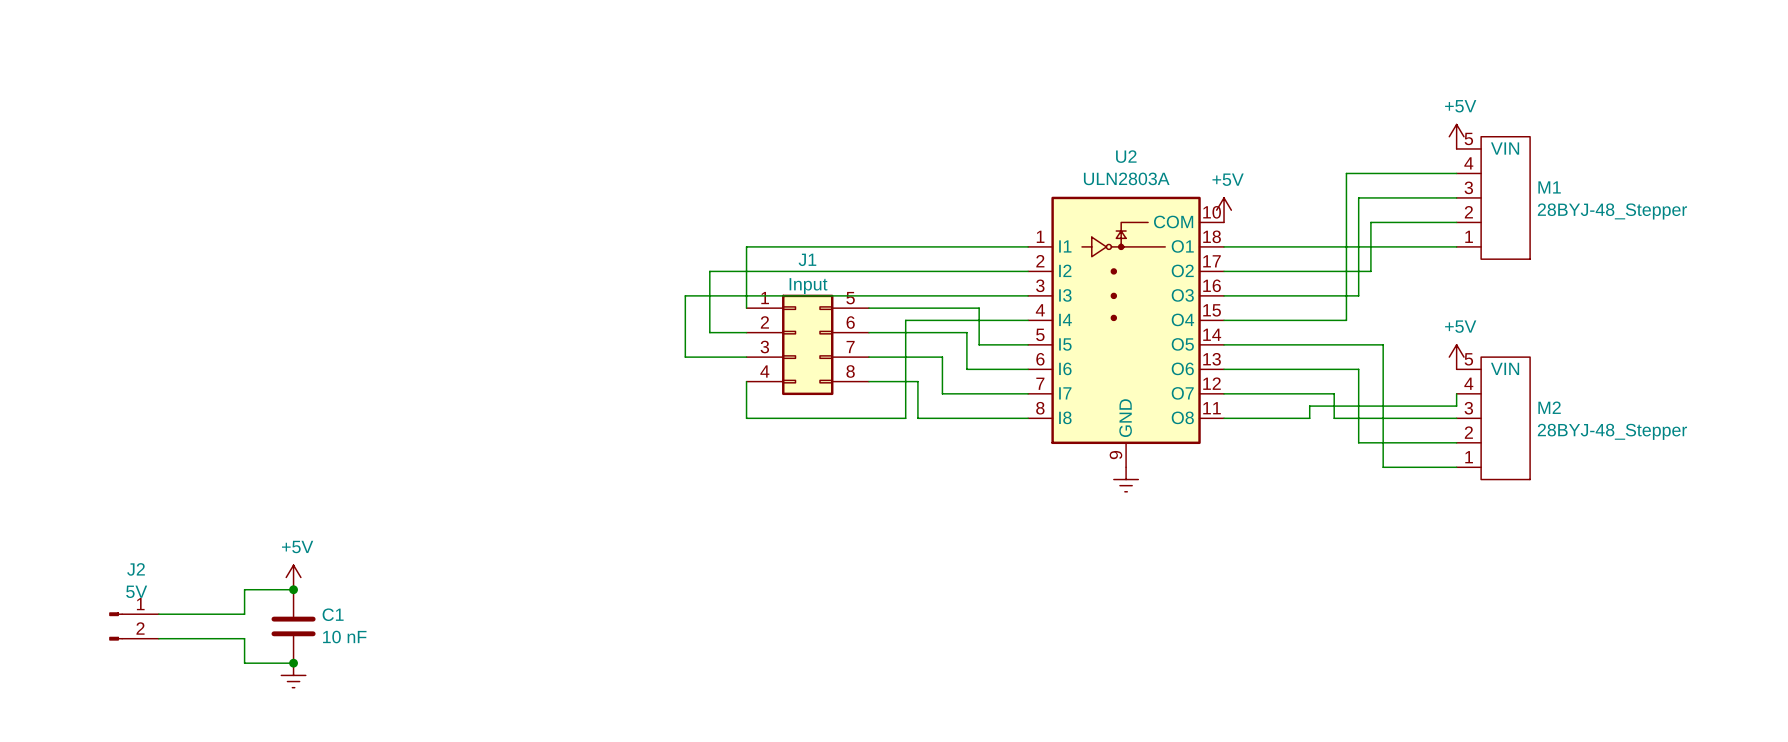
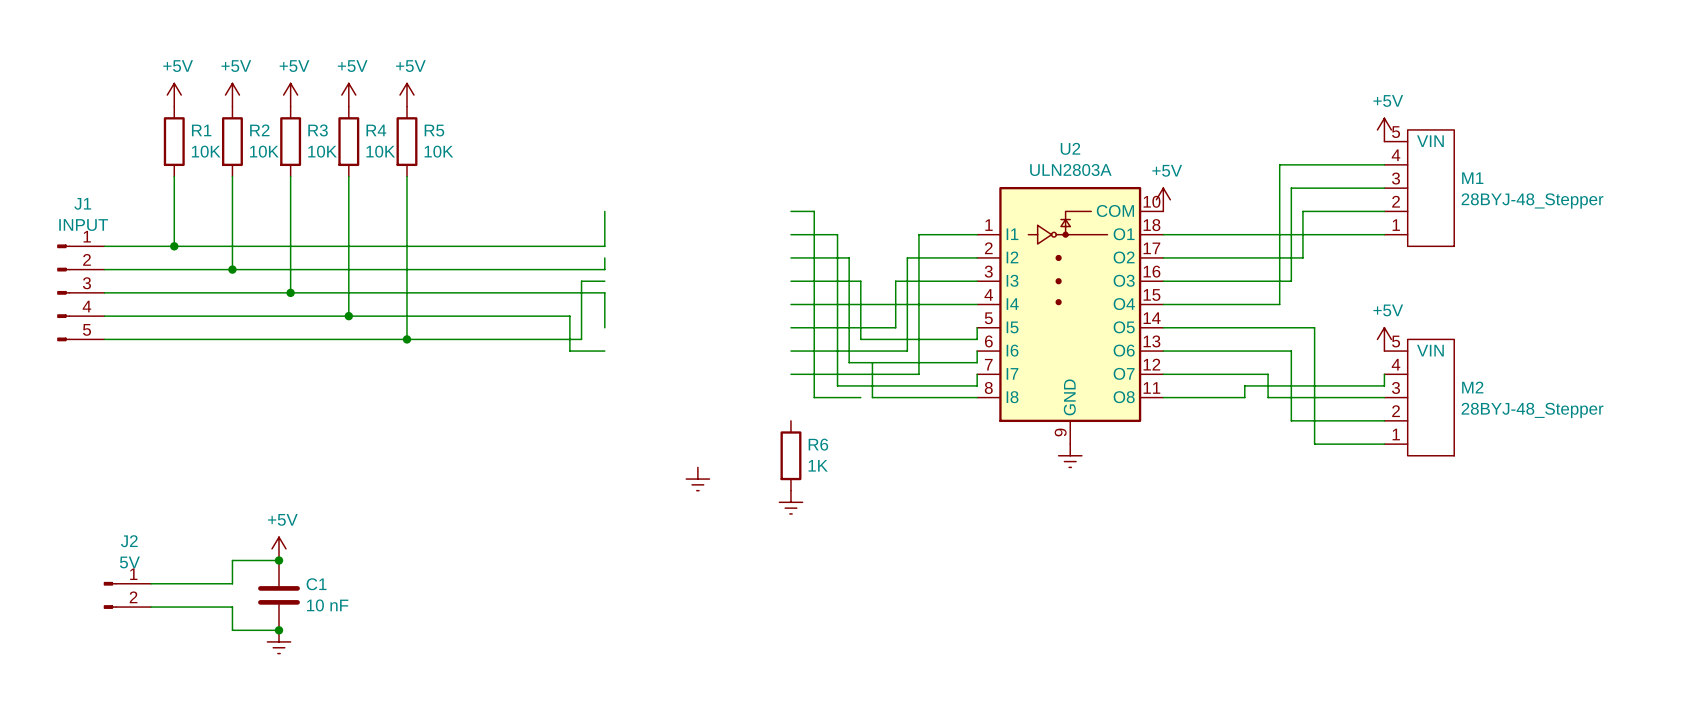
power symbol: none -> +5V (174, 95)
power symbol: none -> +5V (232, 95)
power symbol: none -> +5V (290, 95)
power symbol: none -> +5V (348, 95)
power symbol: none -> +5V (406, 95)
R1: none -> 10K (174, 141)
R2: none -> 10K (232, 141)
R3: none -> 10K (290, 141)
R4: none -> 10K (348, 141)
R5: none -> 10K (406, 141)
wire: none -> (174, 176) (174, 246)
wire: none -> (232, 176) (232, 269)
wire: none -> (290, 176) (290, 292)
wire: none -> (348, 176) (348, 316)
wire: none -> (406, 176) (406, 339)
wire: none -> (604, 211) (604, 246) (104, 246)
wire: (832, 246) (746, 246) (746, 308) -> none
wire: (881, 246) (966, 246) -> (918, 316) (918, 234)
wire: none -> (837, 234) (837, 385) (977, 385) (977, 374)
junction: none -> (174, 246)
wire: none -> (604, 257) (604, 269) (104, 269)
wire: (832, 271) (709, 271) (709, 332) (746, 332) -> none
wire: (893, 271) (954, 271) -> (790, 351) (907, 351) (907, 257)
junction: none -> (232, 269)
J1 value: Input (808, 286) -> INPUT (83, 225)
J1 symbol: [746, 294, 869, 396] -> [57, 244, 105, 342]
wire: none -> (604, 281) (581, 281) (581, 339) (104, 339)
wire: (832, 295) (685, 295) (685, 357) (746, 357) -> none
wire: (905, 295) (942, 295) -> (790, 327) (895, 327) (895, 281)
wire: none -> (860, 281) (860, 304) (790, 304)
wire: none -> (104, 292) (604, 292) (604, 327)
junction: none -> (290, 292)
wire: (868, 308) (979, 308) (979, 344) (1028, 344) -> (895, 339) (977, 339) (977, 327)
wire: none -> (104, 316) (569, 316) (569, 351) (604, 351)
junction: none -> (348, 316)
wire: (868, 332) (966, 332) -> none
junction: none -> (406, 339)
wire: (868, 357) (905, 357) (905, 418) -> none
wire: (942, 357) (942, 393) -> (790, 374) (895, 374)
wire: (966, 369) (1028, 369) -> (872, 362) (977, 362) (977, 351)
wire: (746, 381) (746, 418) (856, 418) -> (790, 211) (814, 211) (814, 397)
wire: (868, 381) (893, 381) -> (849, 257) (849, 362)
wire: (966, 393) (1028, 393) -> (918, 374) (918, 351)
R6: none -> 1K (790, 455)
power symbol: none -> (697, 479)
power symbol: none -> (790, 502)

